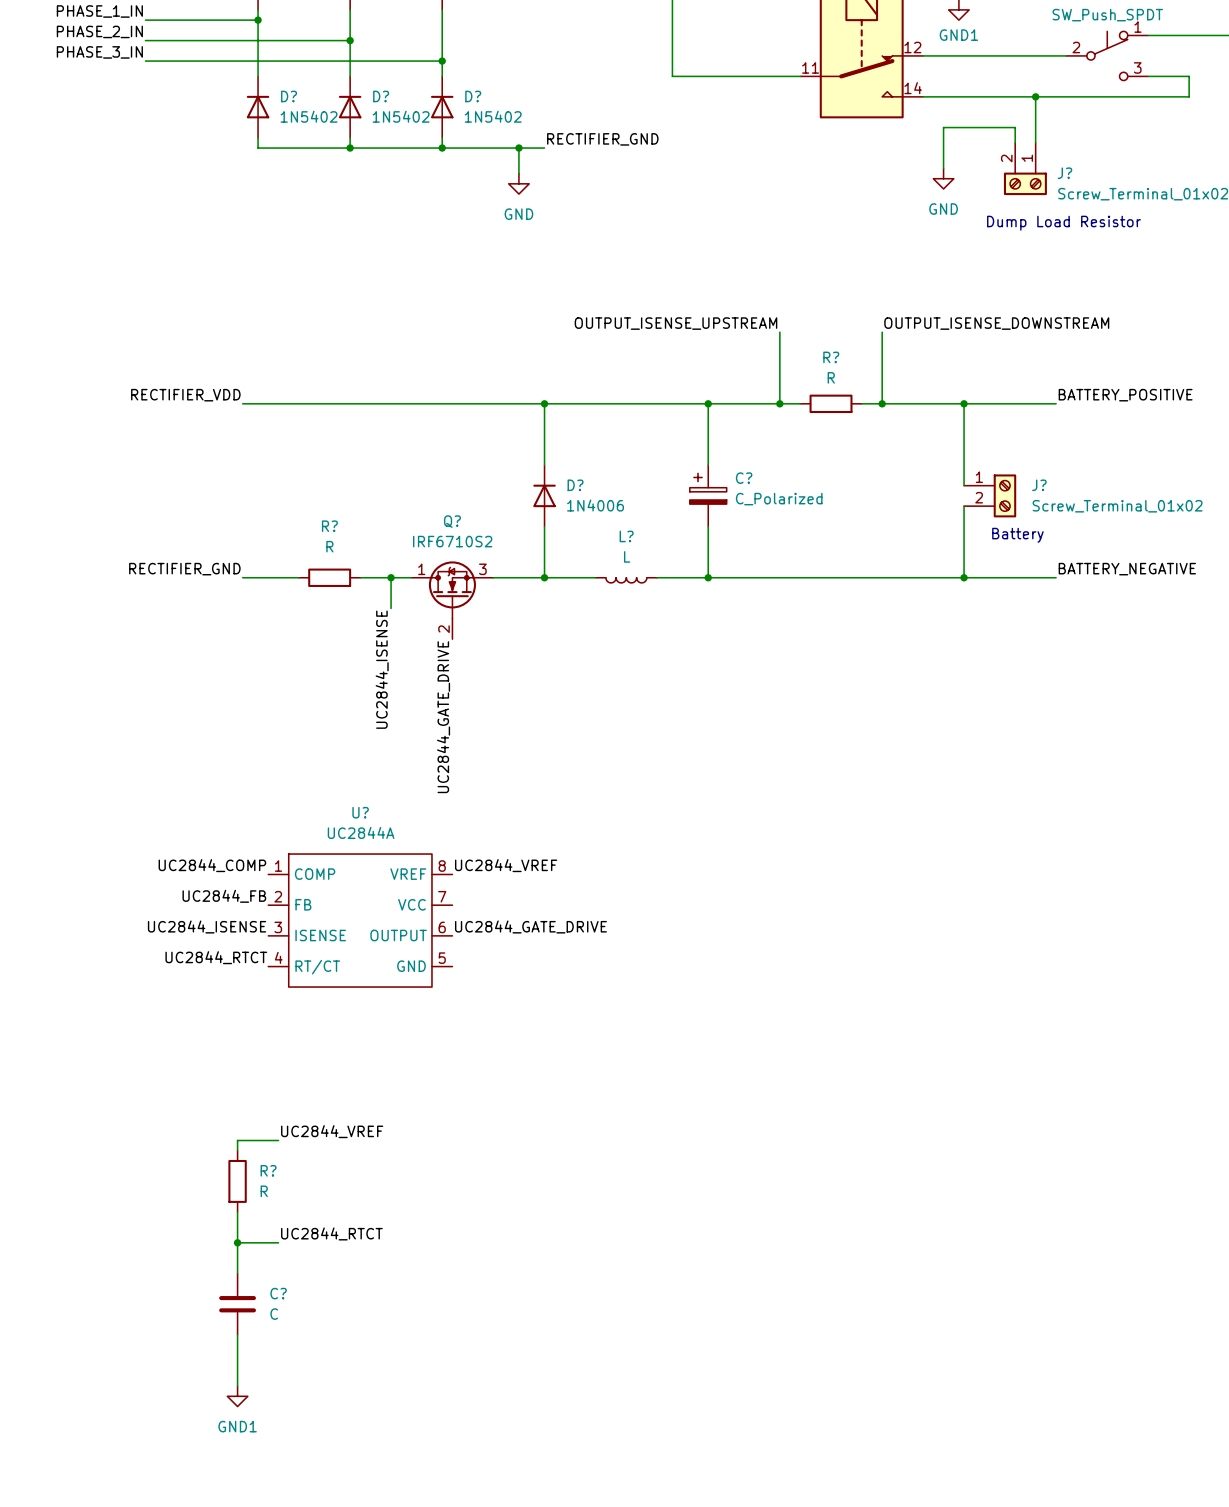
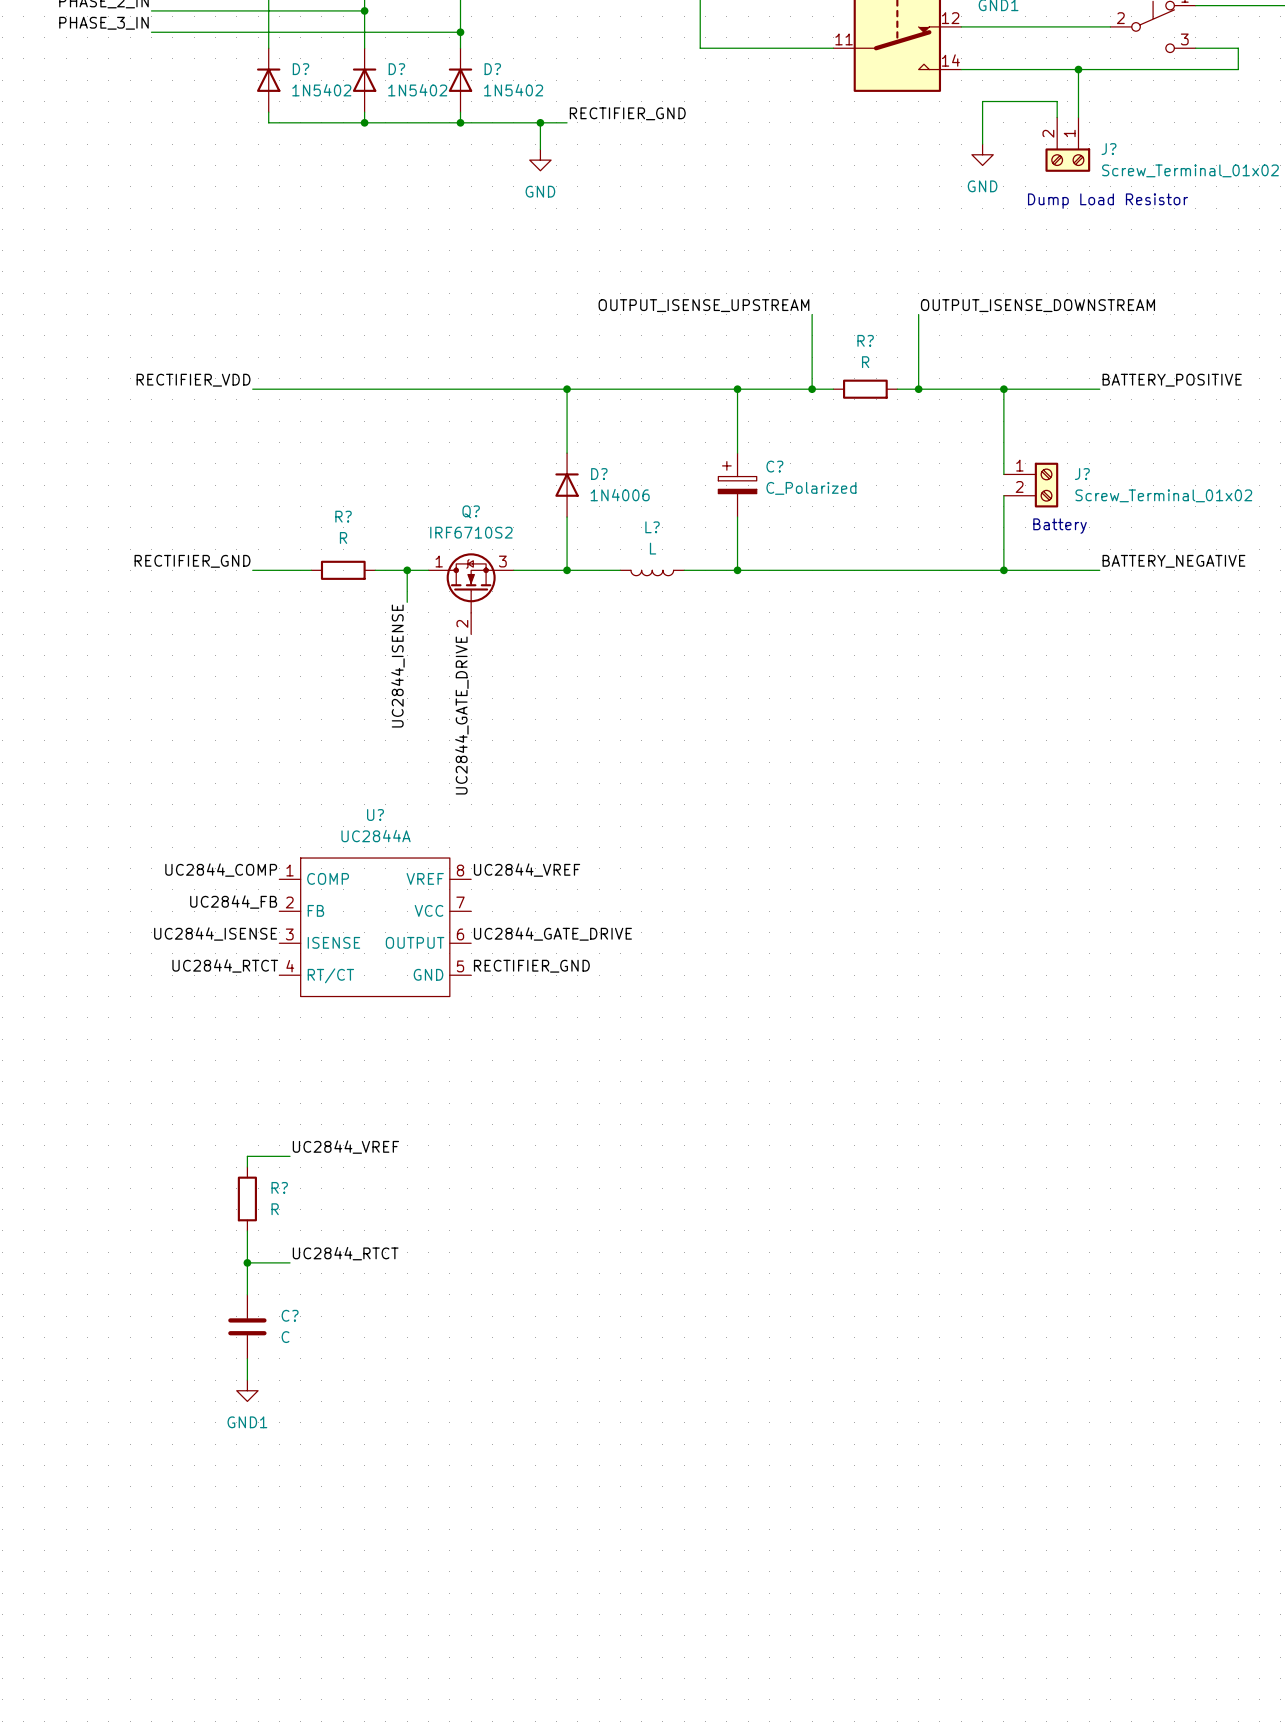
label: none -> RECTIFIER_GND (531, 966)
wire: (237, 1355) (237, 1386) -> none
power symbol position: GND1 (237, 1396) -> GND1 (247, 1390)

